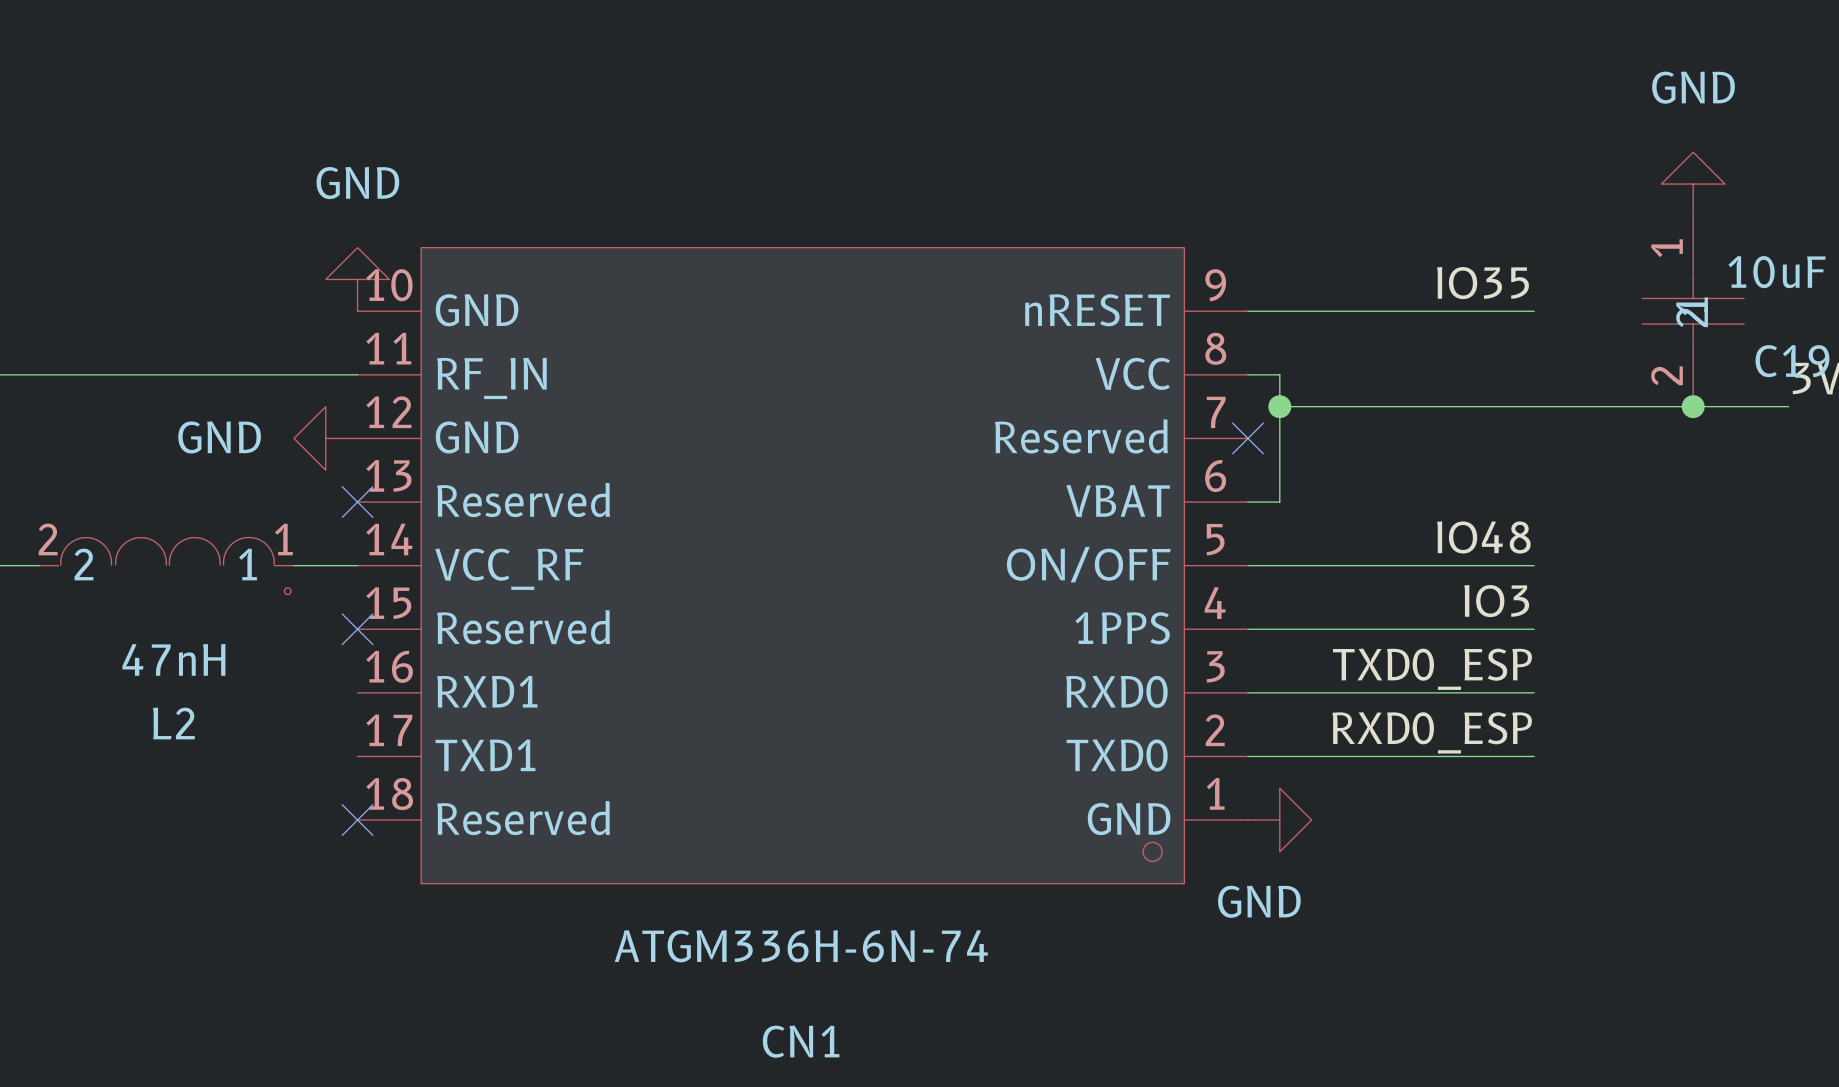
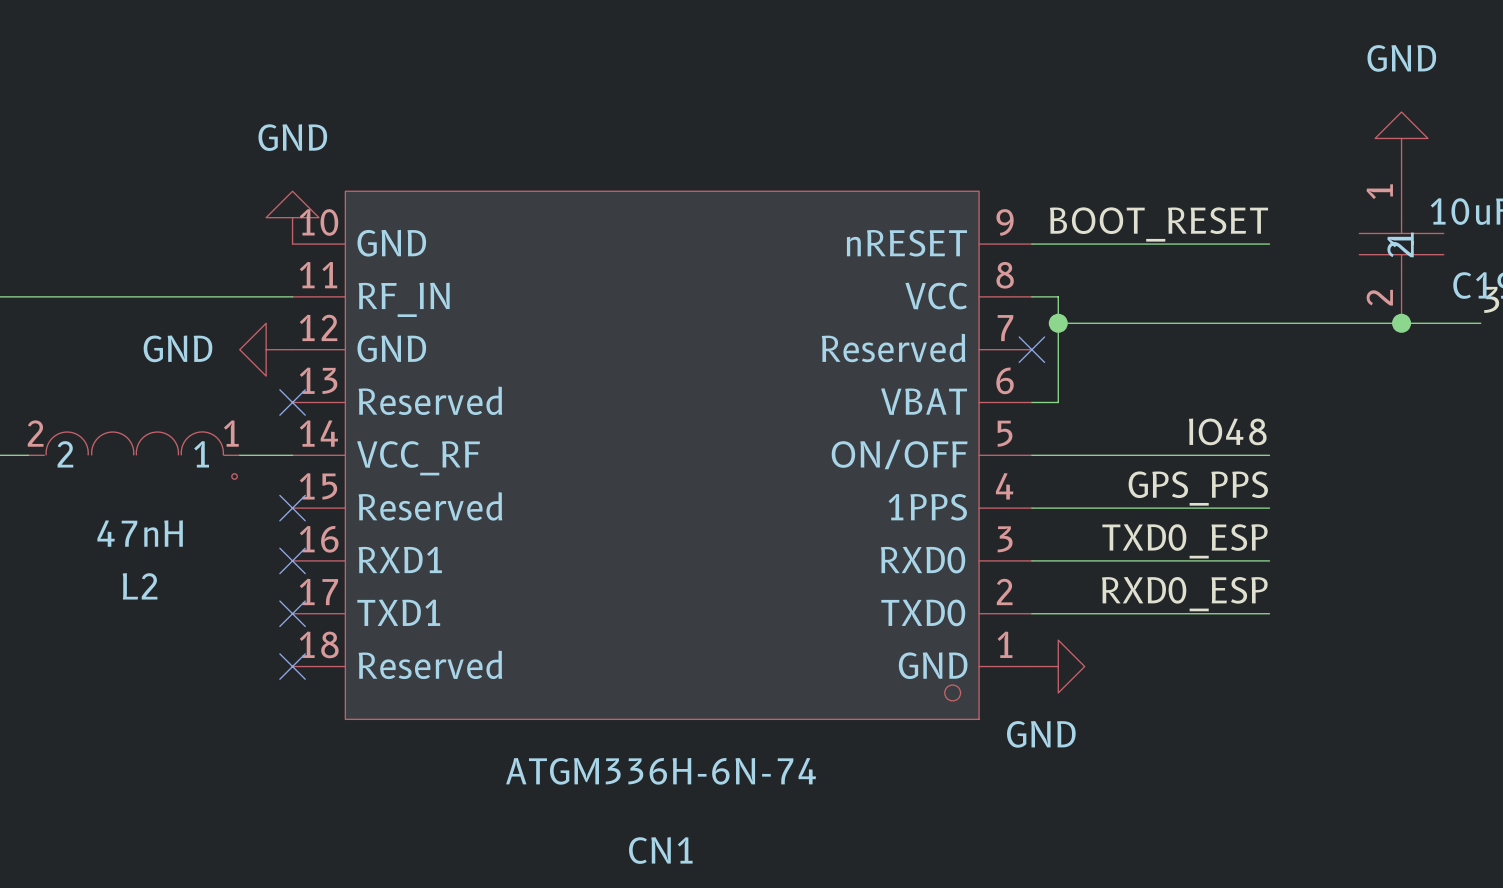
label: IO35 (1483, 283) -> BOOT_RESET (1158, 224)
label: IO3 (1496, 601) -> GPS_PPS (1198, 488)
no-connect mark: none -> (292, 560)
no-connect mark: none -> (292, 613)

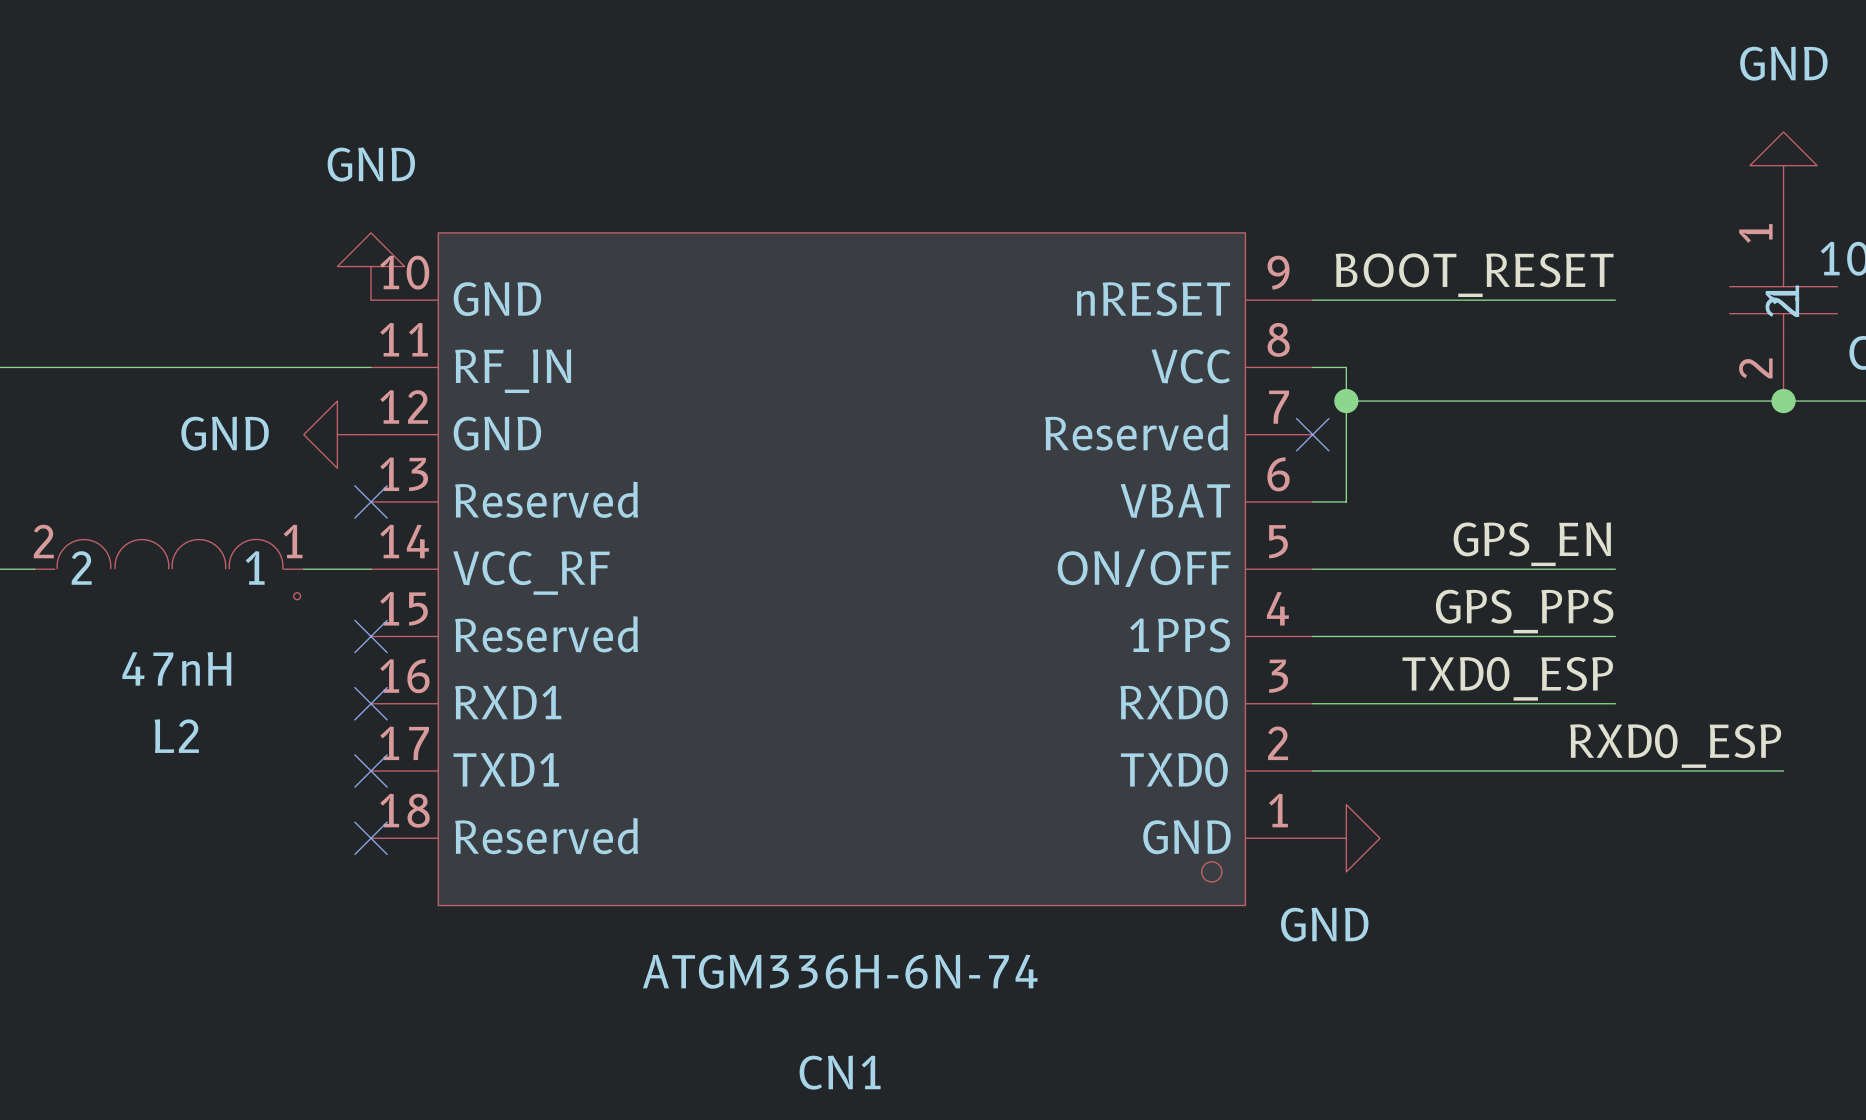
label: IO48 (1227, 431) -> GPS_EN (1532, 544)
label position: RXD0_ESP (1184, 594) -> RXD0_ESP (1675, 746)
wire: none -> (1615, 771) (1783, 771)

